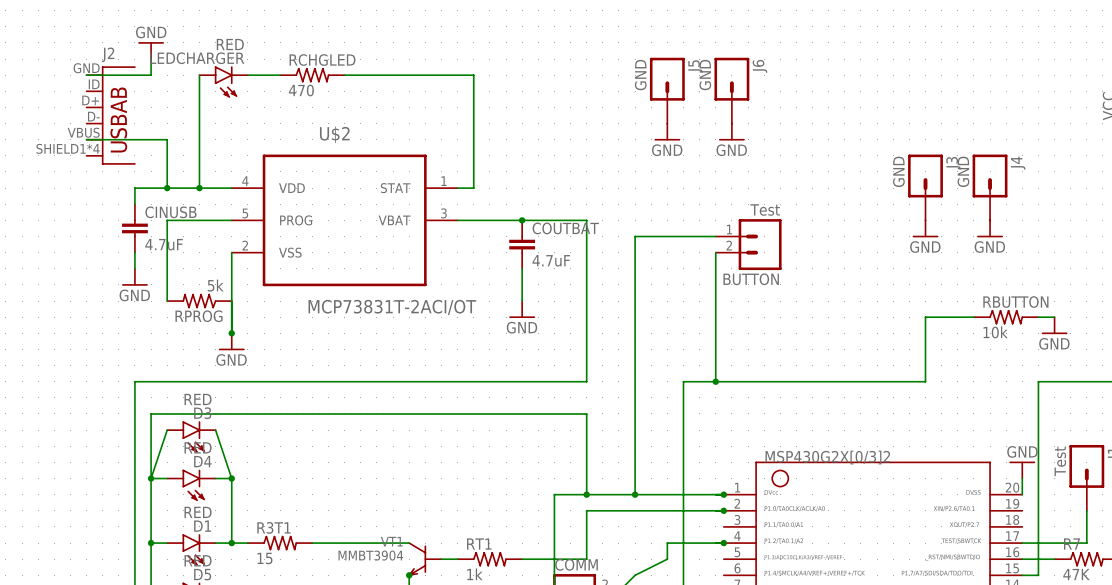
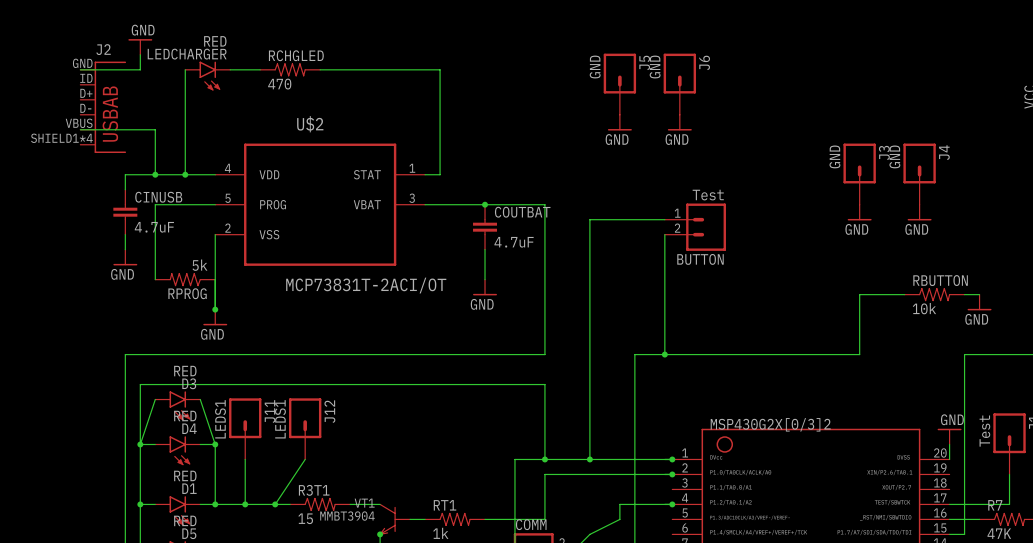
J11: none -> LEDS1 (245, 428)
J12: none -> LEDS1 (305, 428)
wire: none -> (245, 459) (245, 504)
wire: none -> (305, 459) (275, 504)
junction: none -> (245, 504)
R3T1 position: (280, 543) -> (320, 504)
junction: none -> (275, 504)

